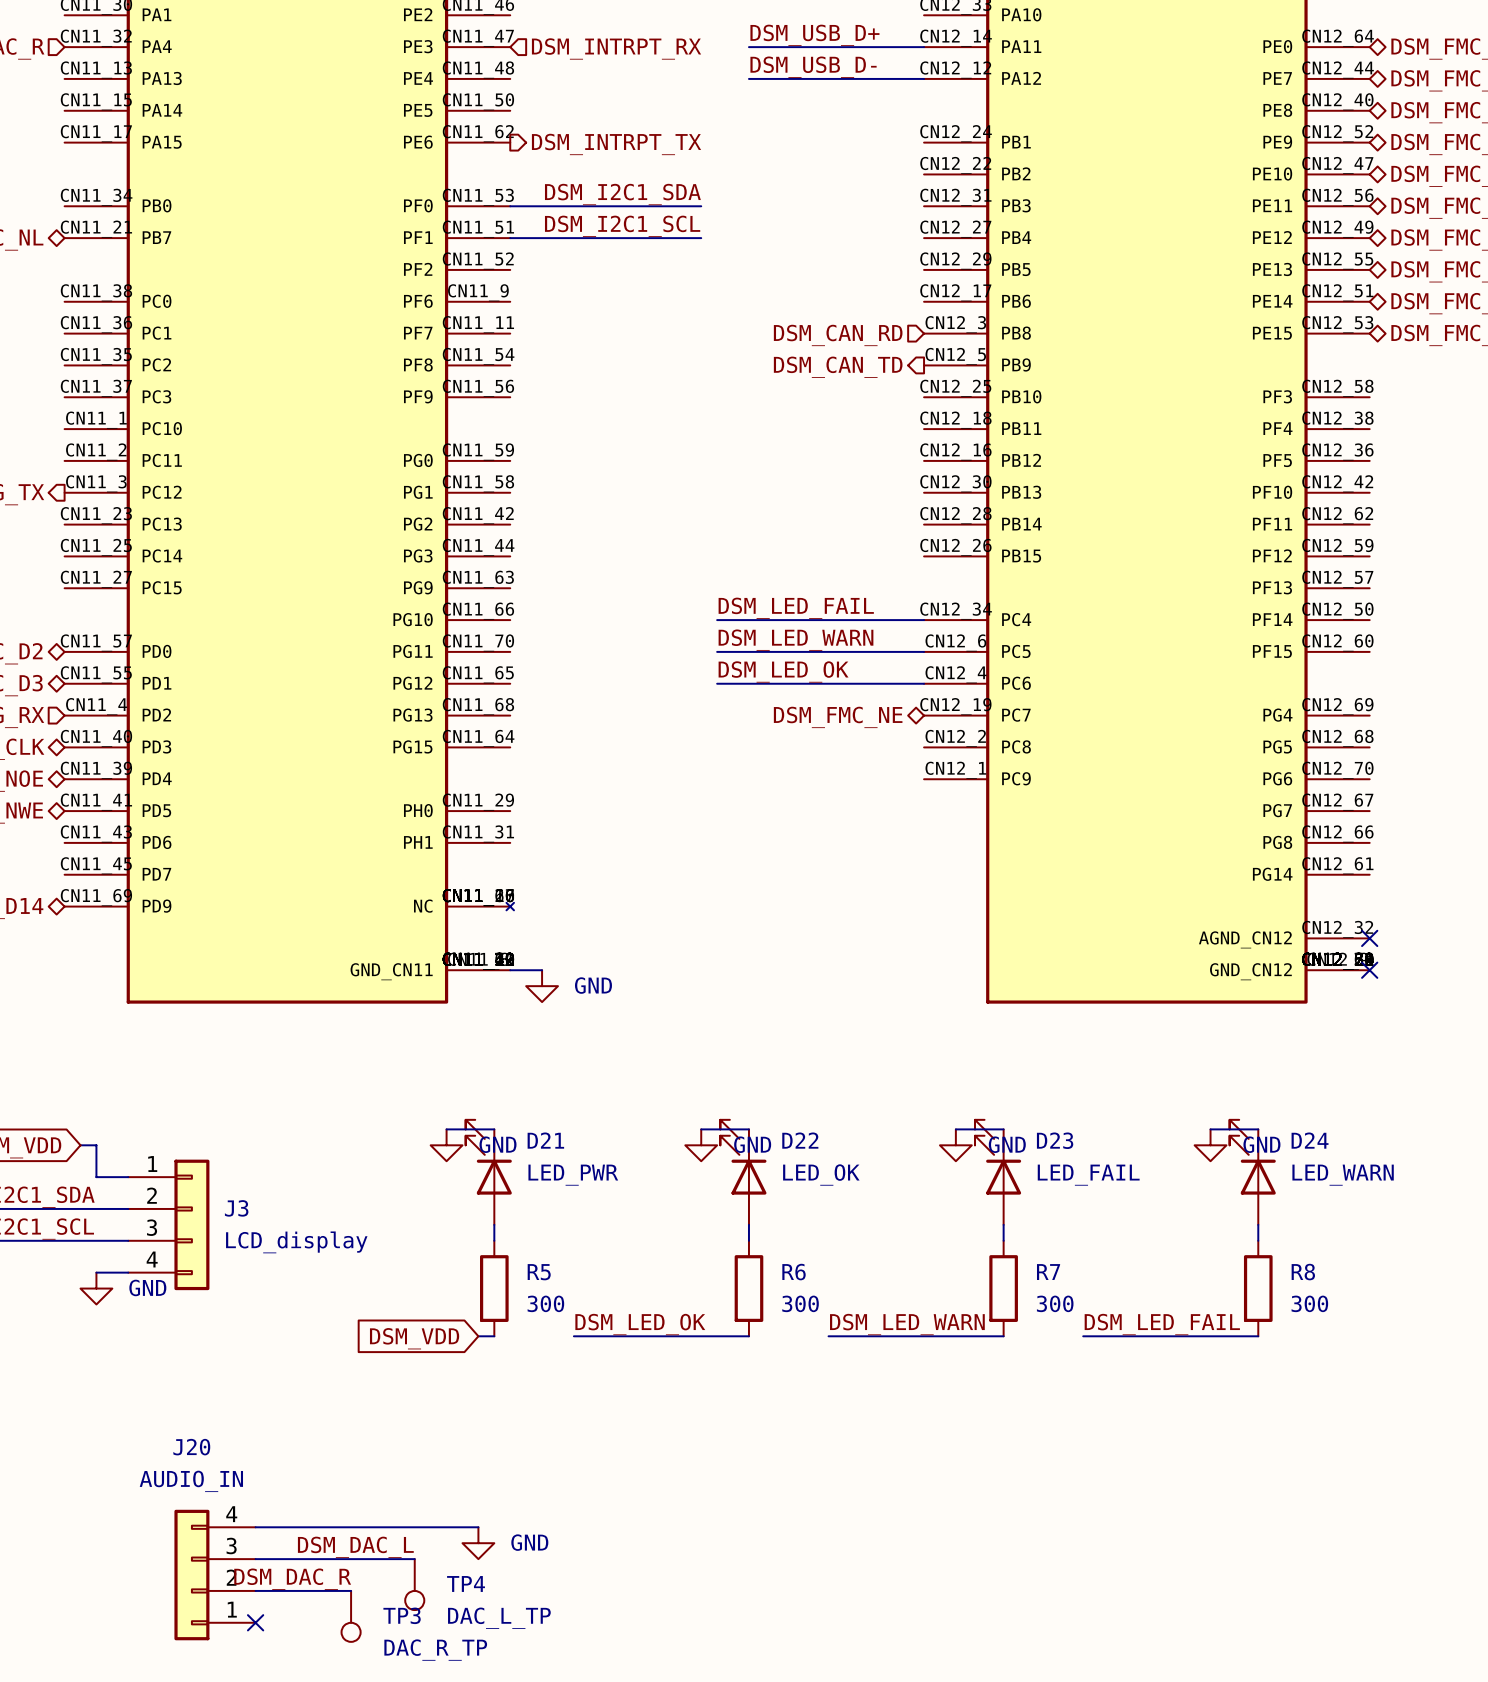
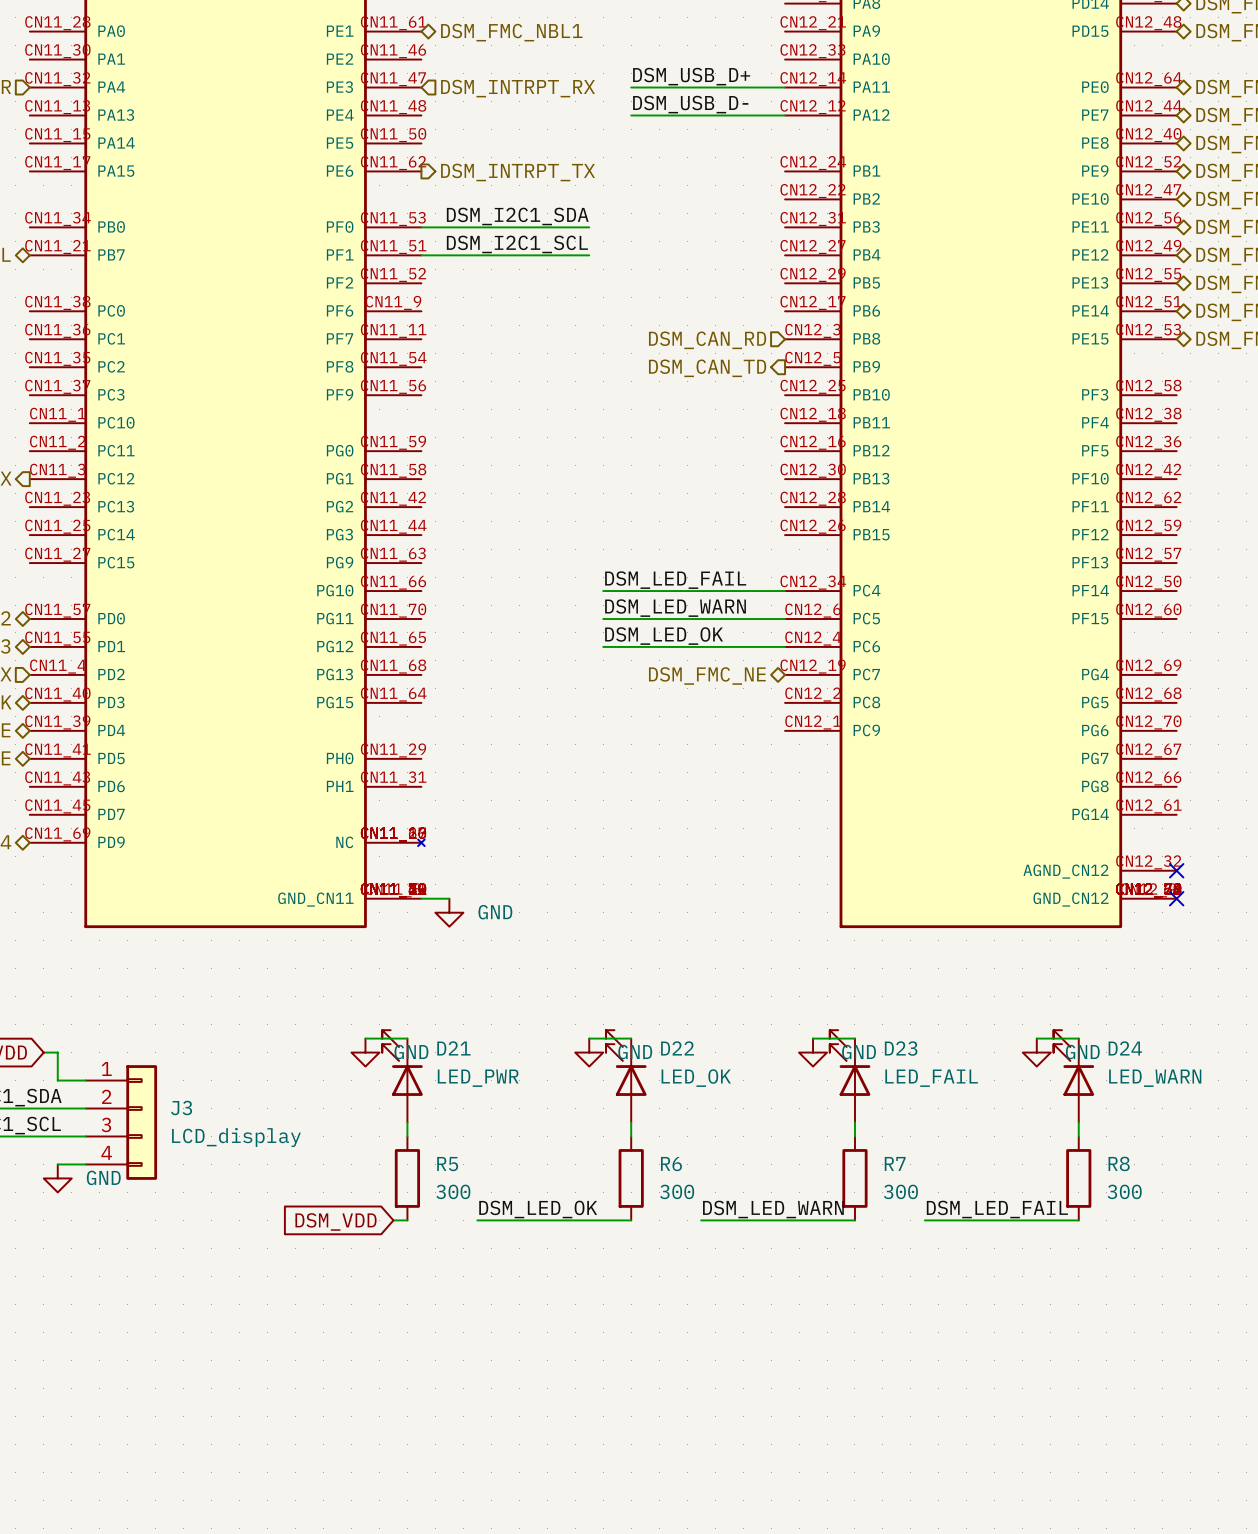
wire: (255, 1527) (478, 1527) -> none
power symbol: GND (478, 1543) -> none
label: DSM_DAC_L (355, 1547) -> none
wire: (255, 1559) (414, 1559) -> none
J20: AUDIO_IN (215, 1575) -> none
label: DSM_DAC_R (292, 1579) -> none
TP4: DAC_L_TP (414, 1584) -> none
wire: (255, 1590) (351, 1590) -> none
TP3: DAC_R_TP (351, 1616) -> none
no-connect mark: (255, 1622) -> none

